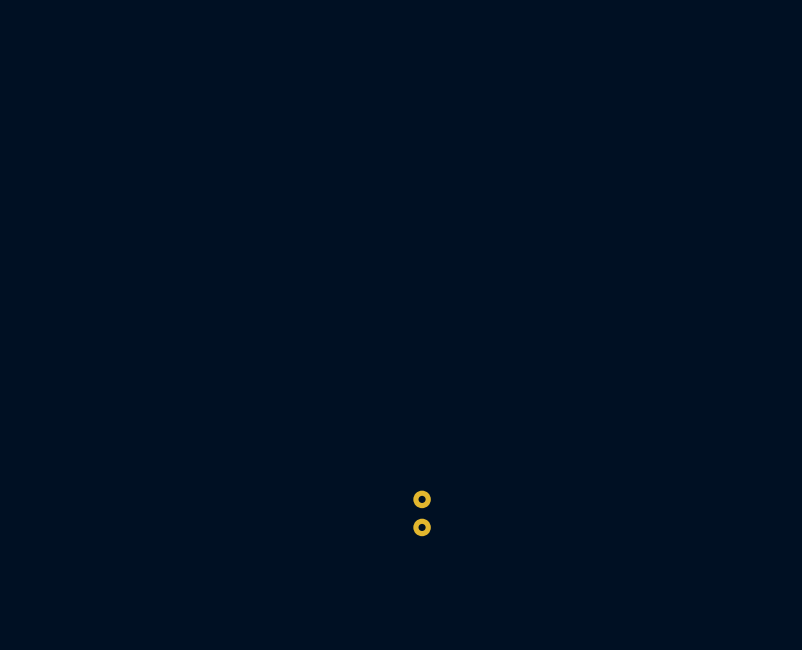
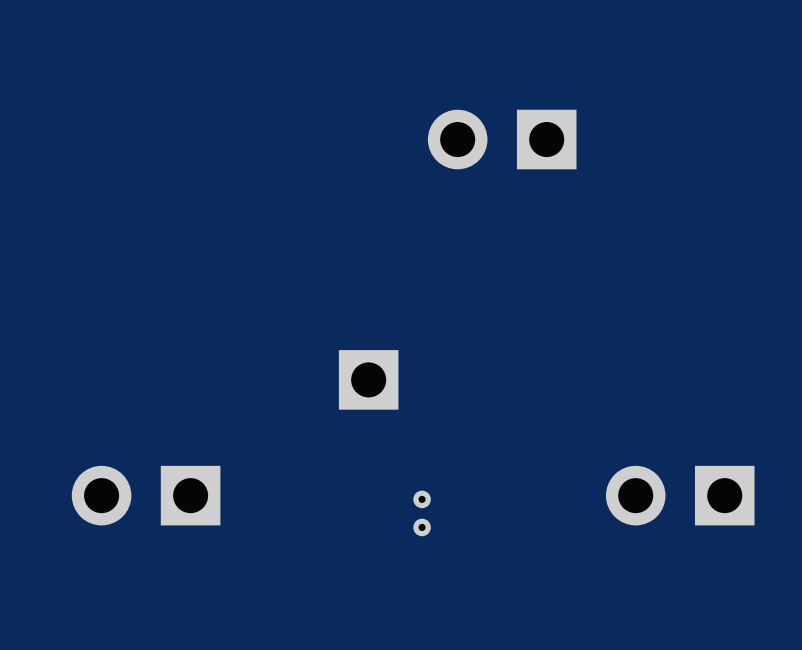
part: none -> (502, 139)
part: none -> (368, 379)
part: none -> (146, 495)
part: none -> (680, 495)

